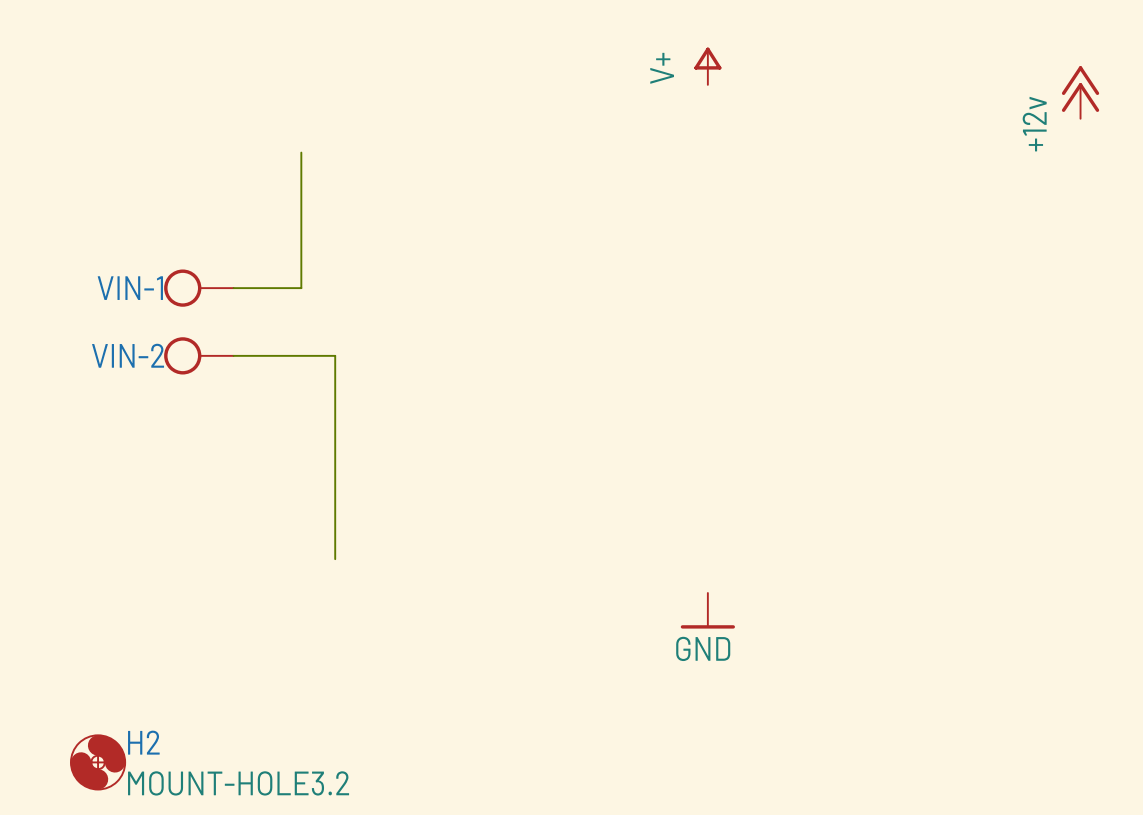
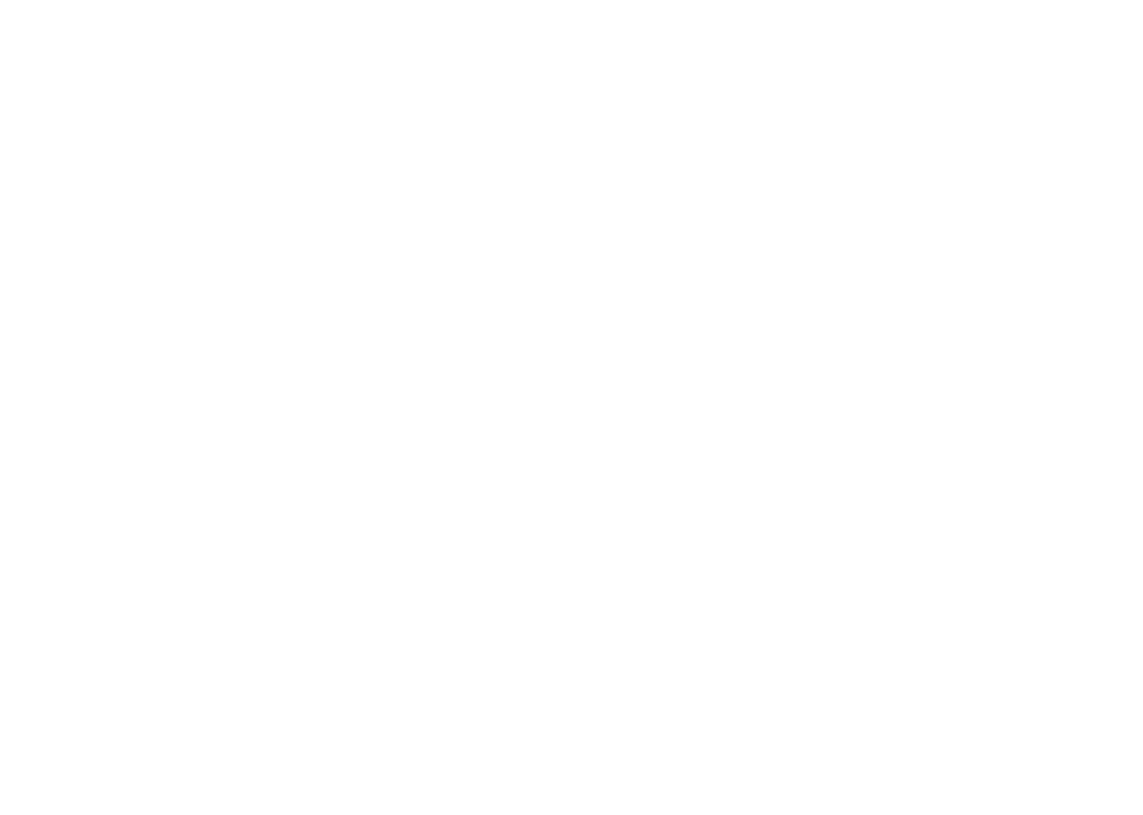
power symbol: V+ (707, 66) -> none
power symbol: +12v (1080, 92) -> none
wire: (301, 152) (301, 288) (233, 288) -> none
VIN-1: (198, 288) -> none
VIN-2: (198, 355) -> none
wire: (233, 355) (335, 355) (335, 559) -> none
power symbol: GND (707, 610) -> none
H2: MOUNT-HOLE3.2 (98, 762) -> none

